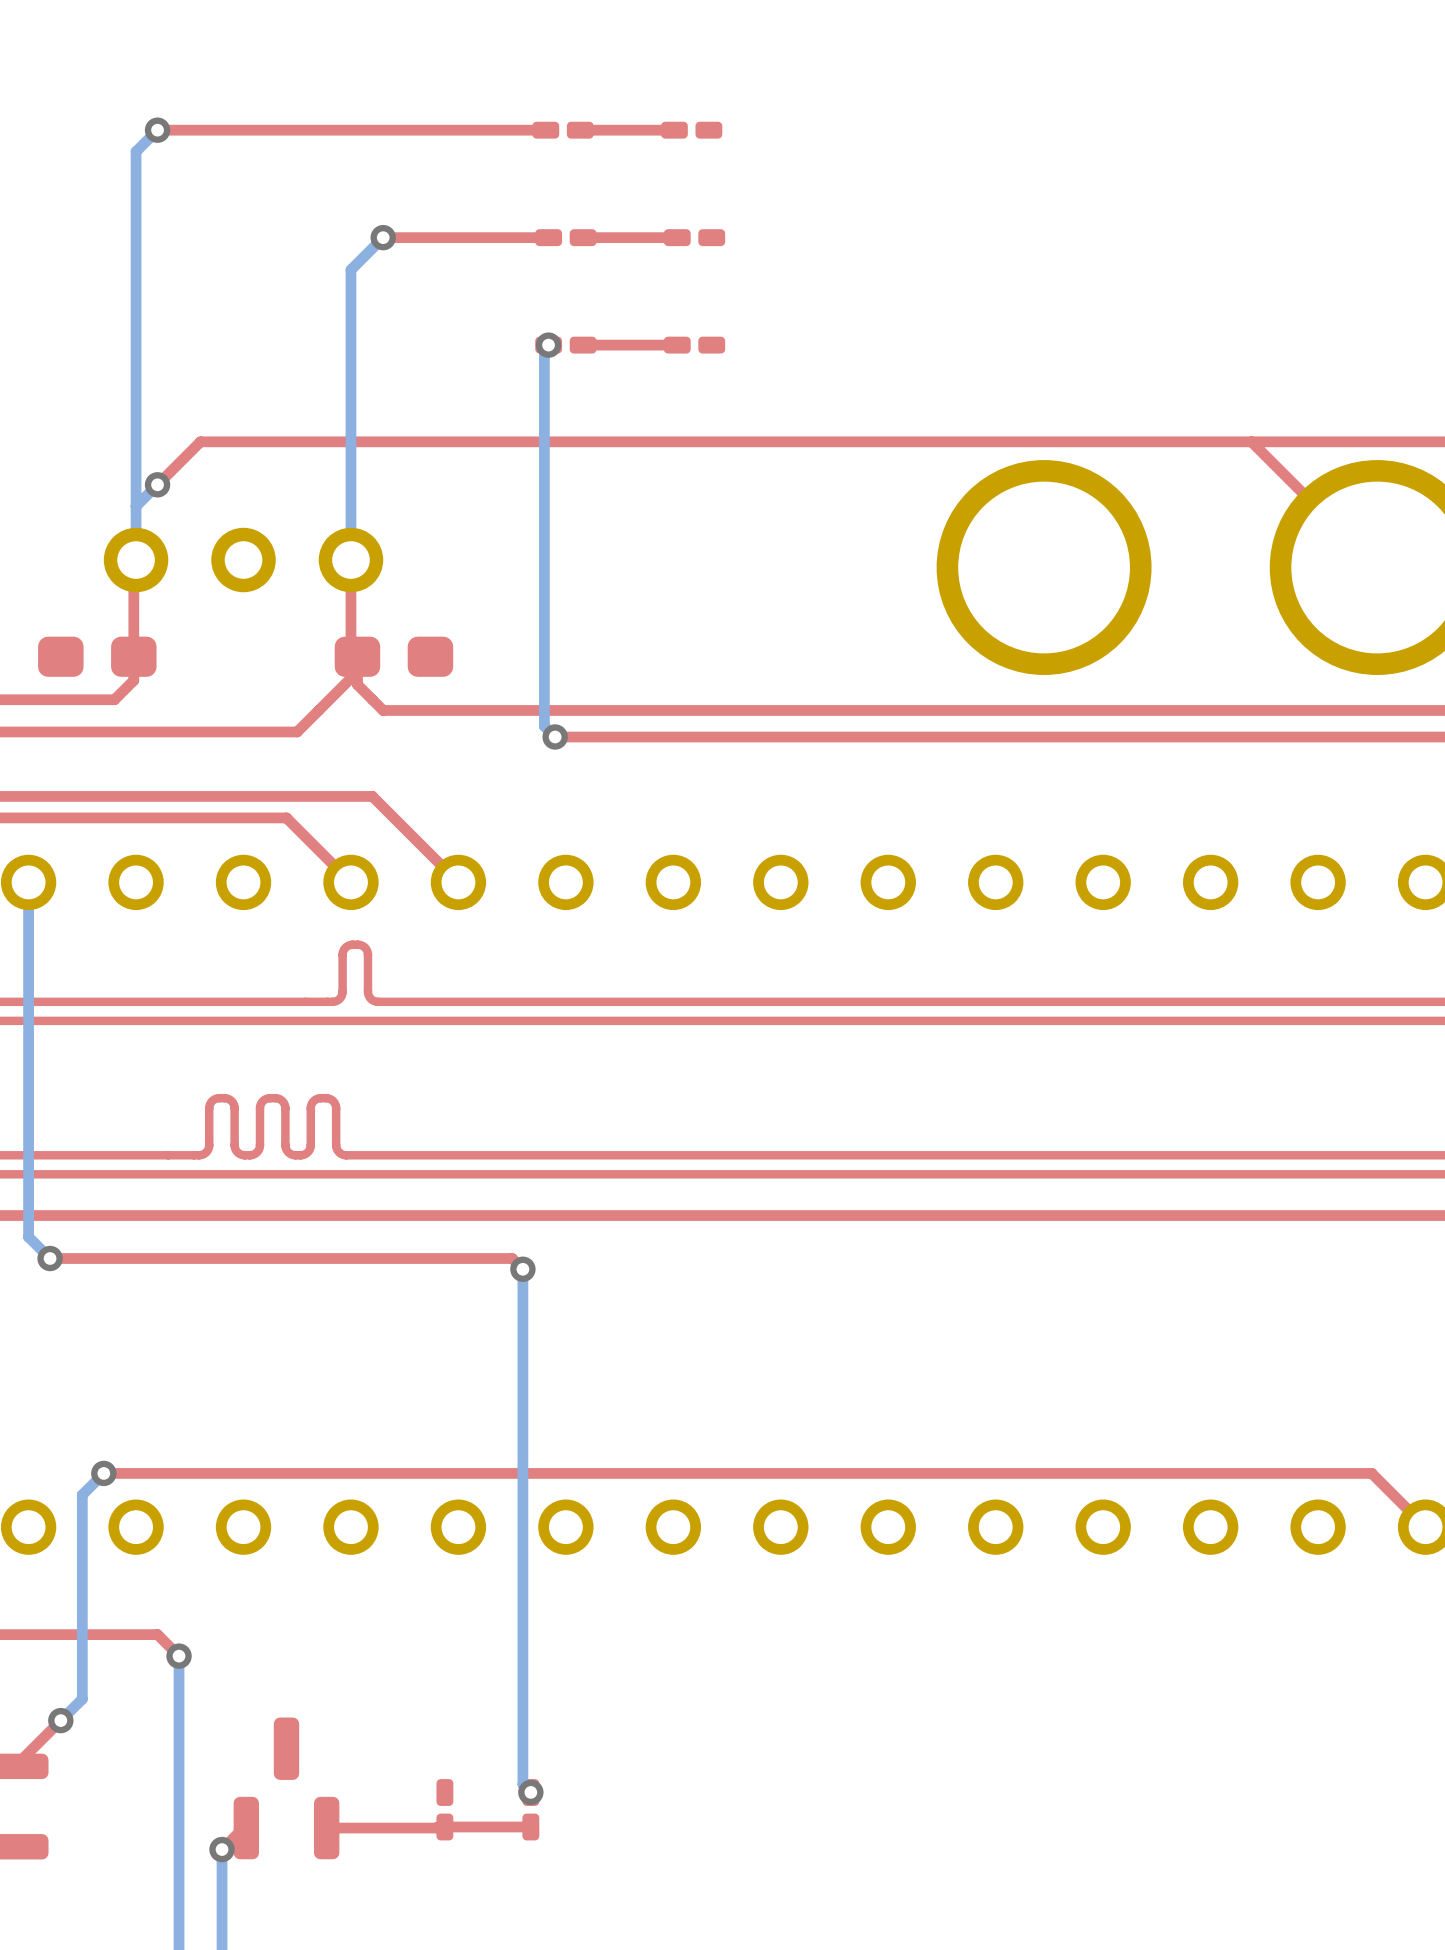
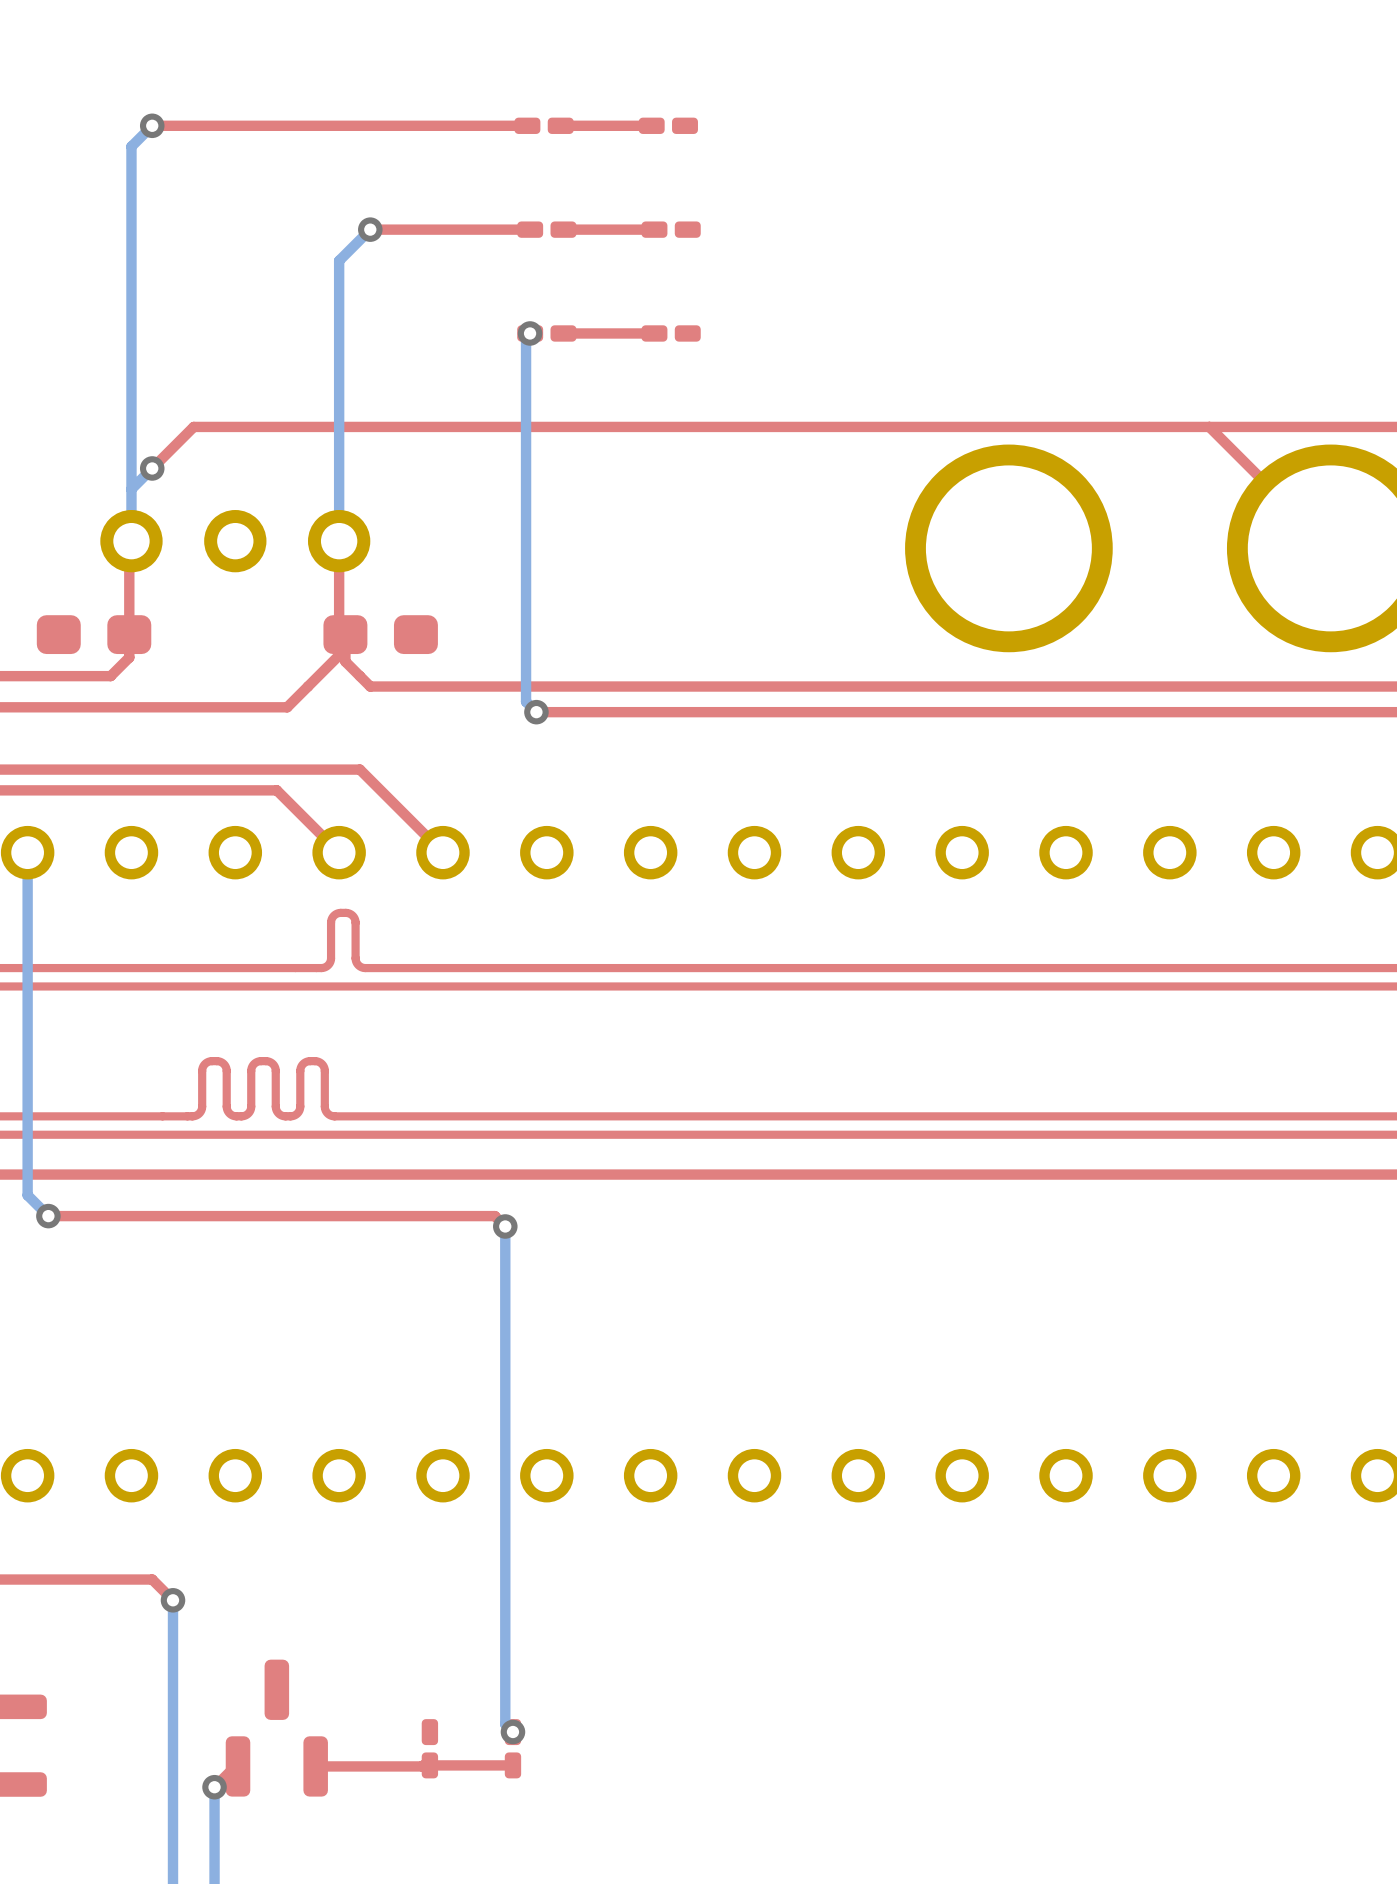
top track: (103, 1473) (1371, 1473) (1425, 1527) -> none
bottom track: (103, 1473) (82, 1494) (82, 1699) (60, 1720) -> none
via: (103, 1473) -> none
top track: (60, 1720) (17, 1764) (17, 1766) -> none
via: (60, 1720) -> none

